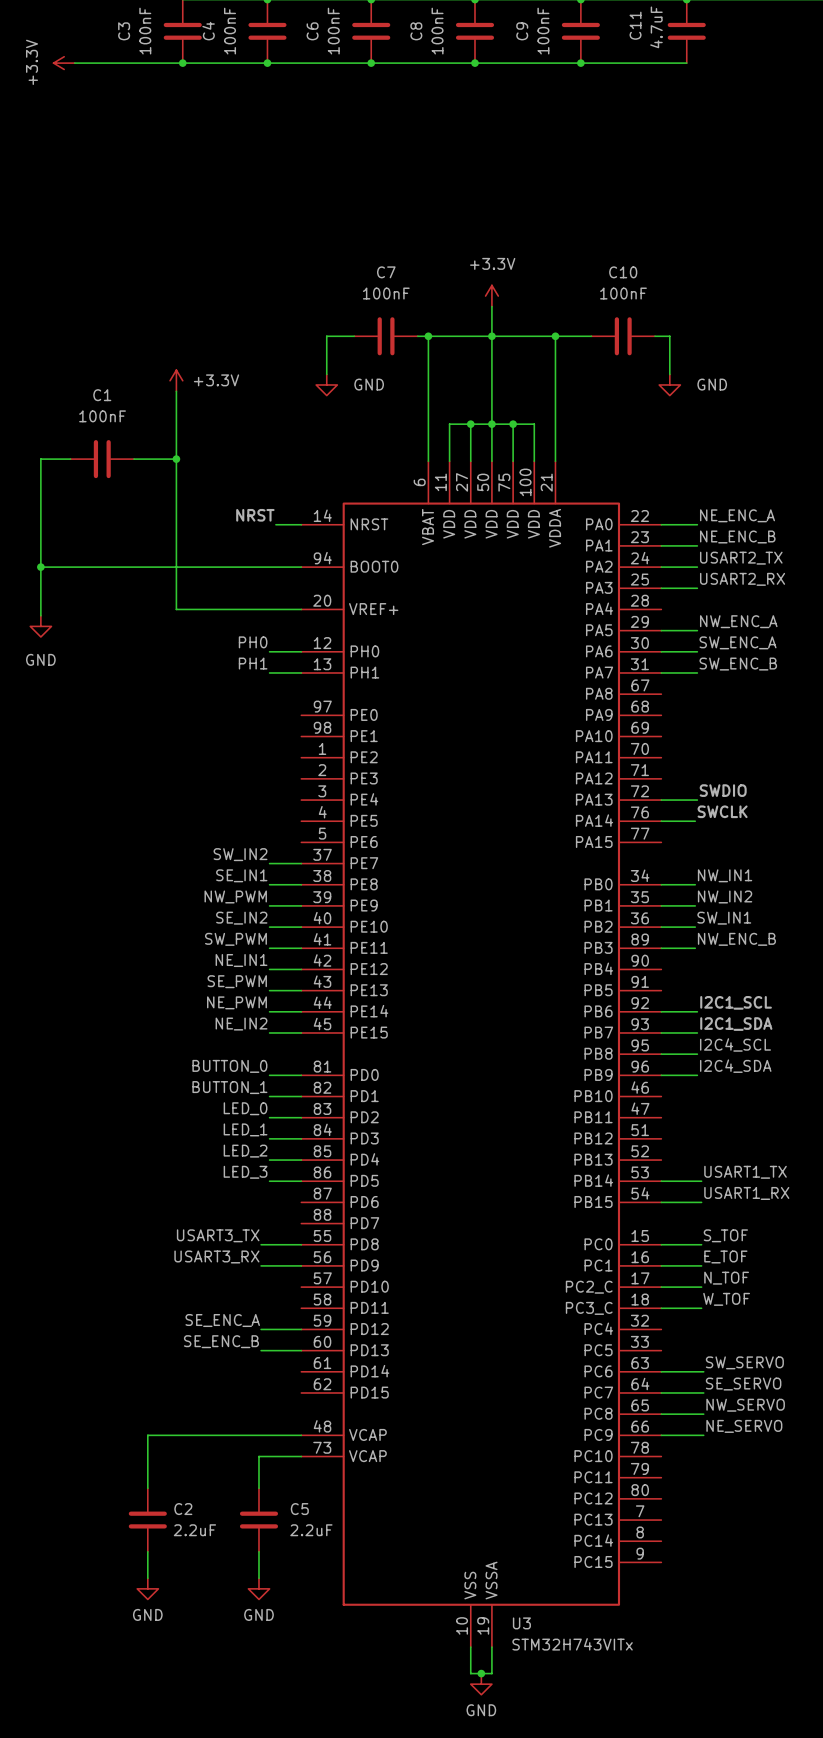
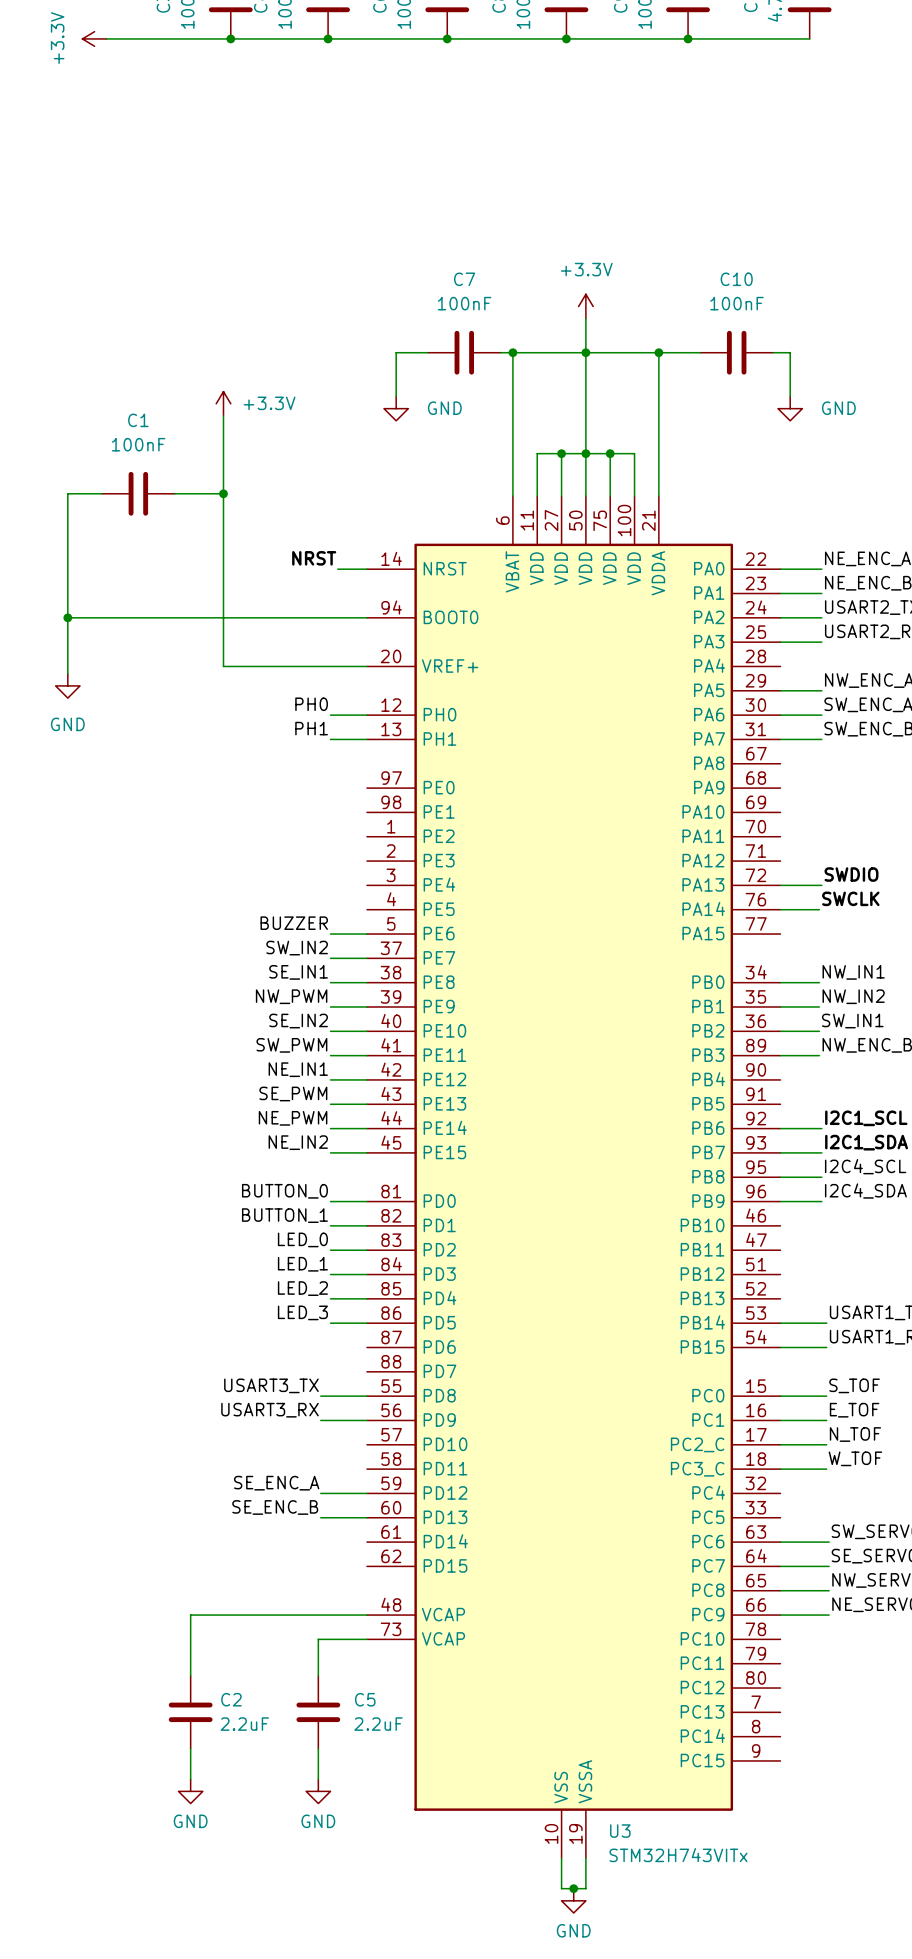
label: none -> BUZZER (294, 923)
wire: none -> (330, 934) (366, 934)

